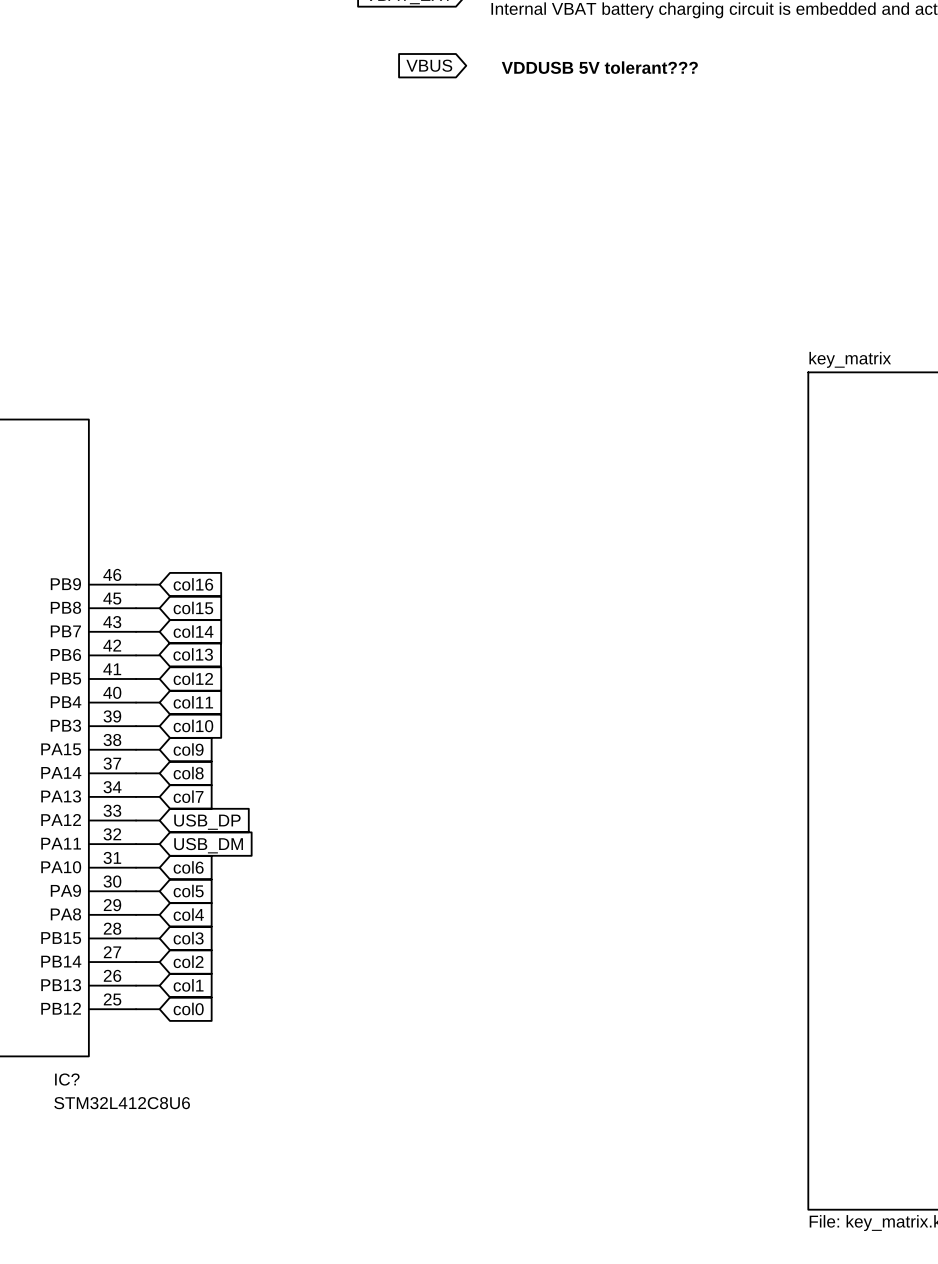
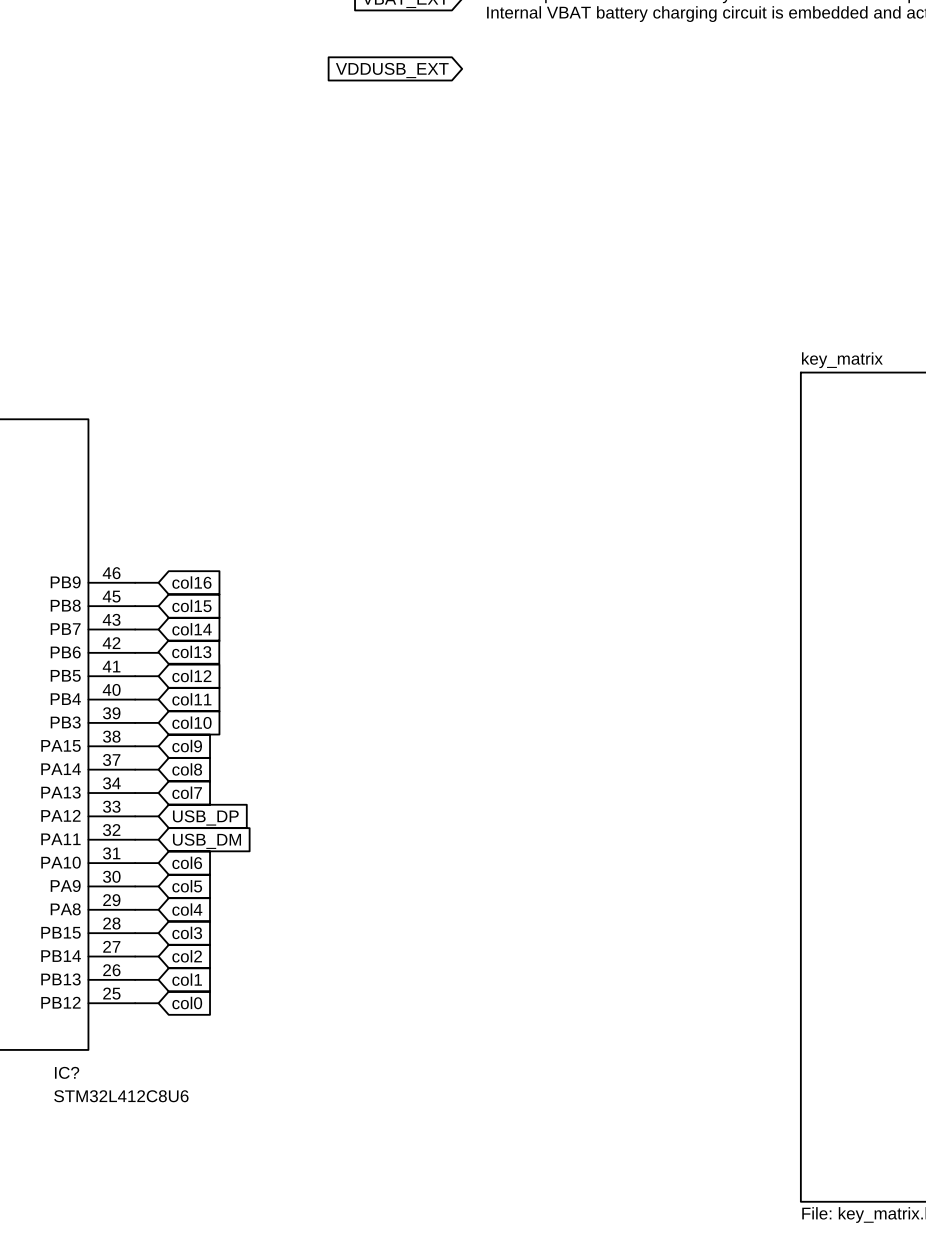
global label: VBUS (429, 65) -> VDDUSB_EXT (392, 70)
text: VDDUSB 5V tolerant??? (599, 67) -> none

